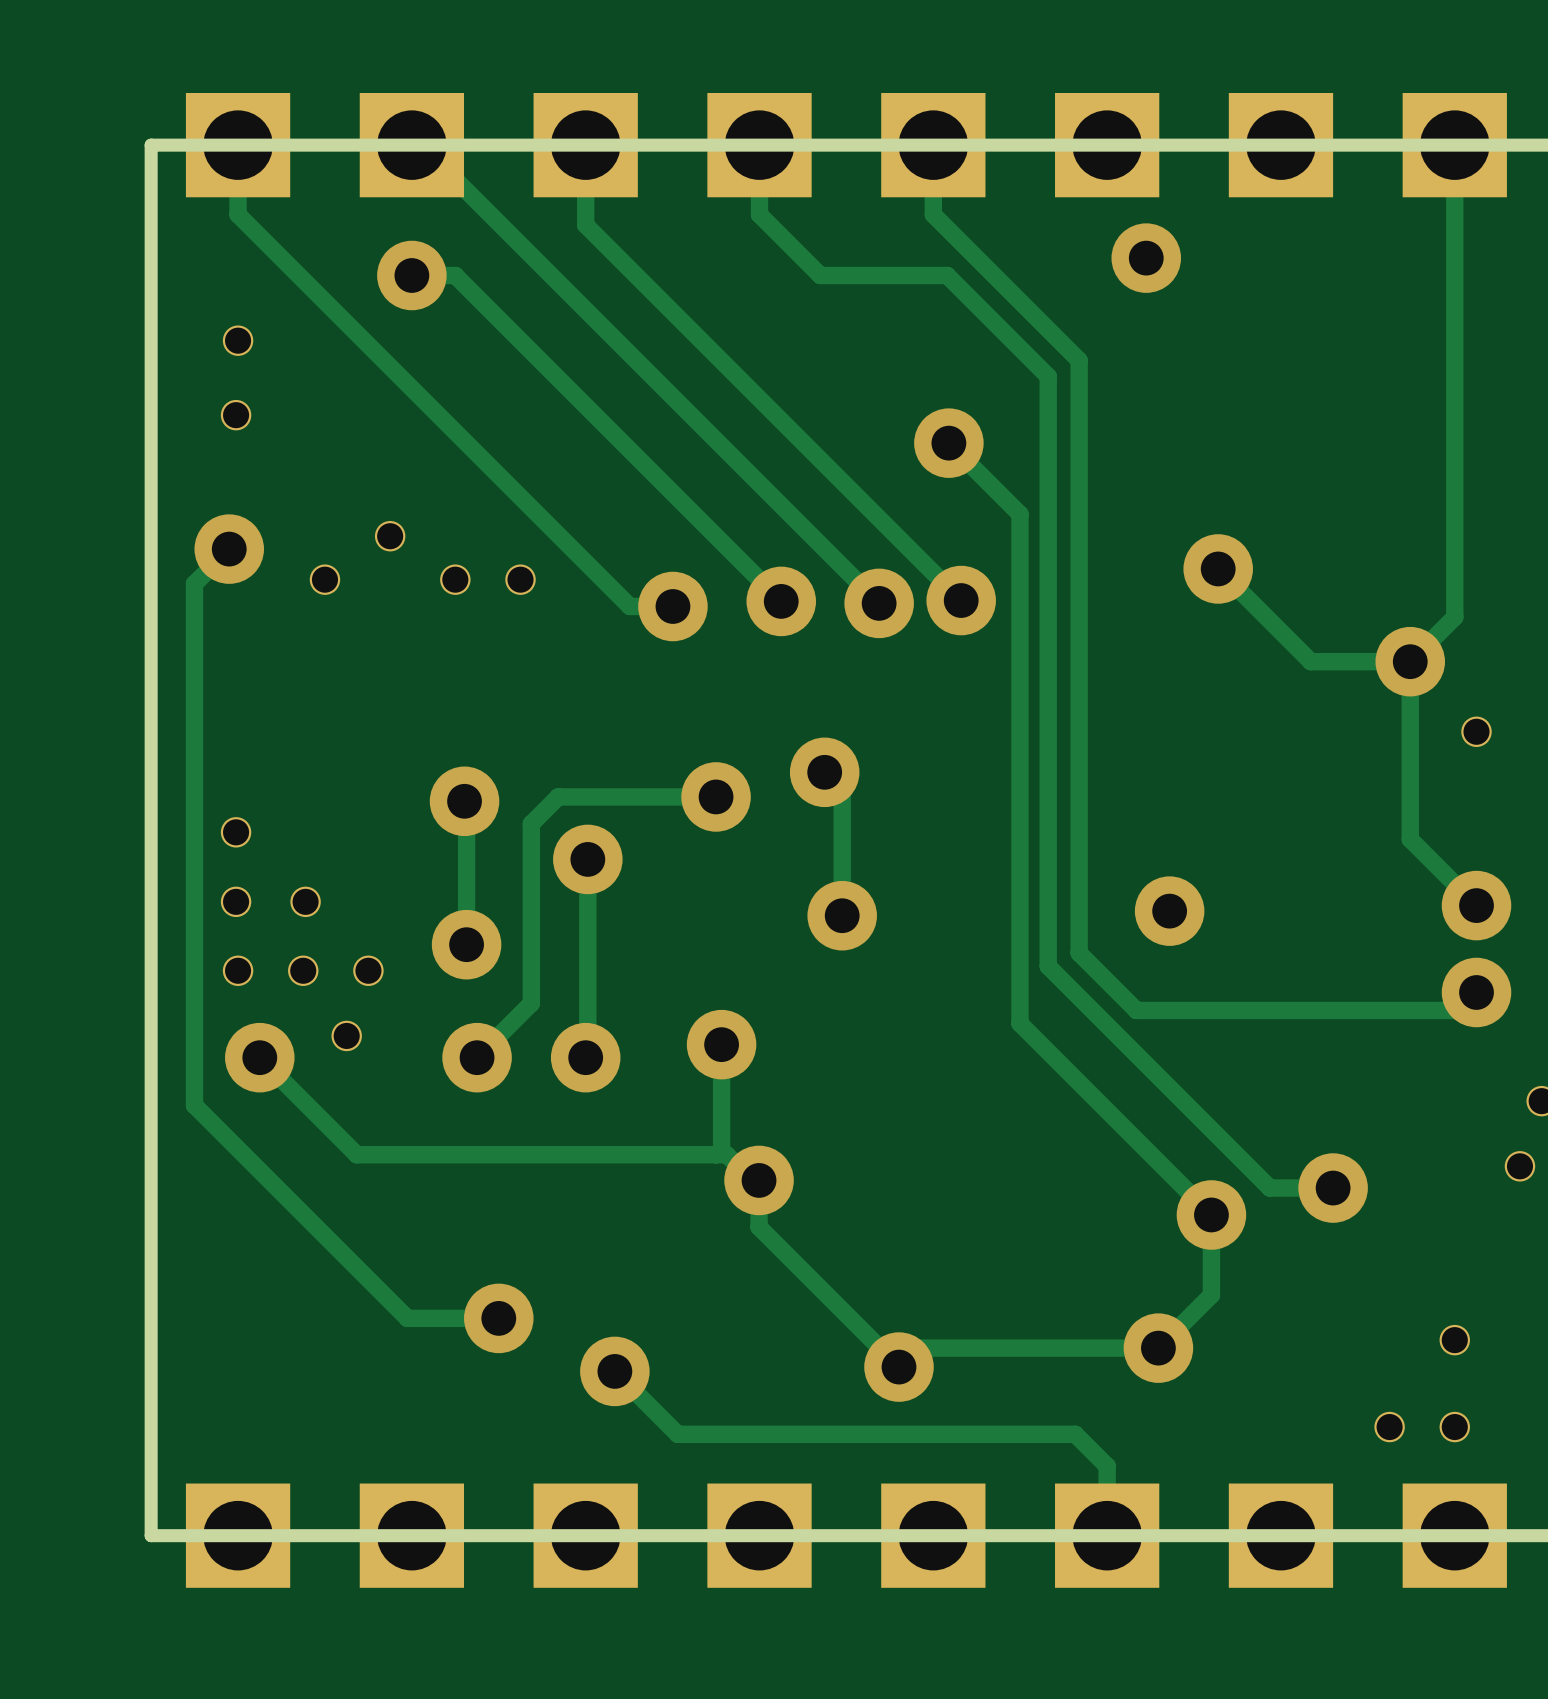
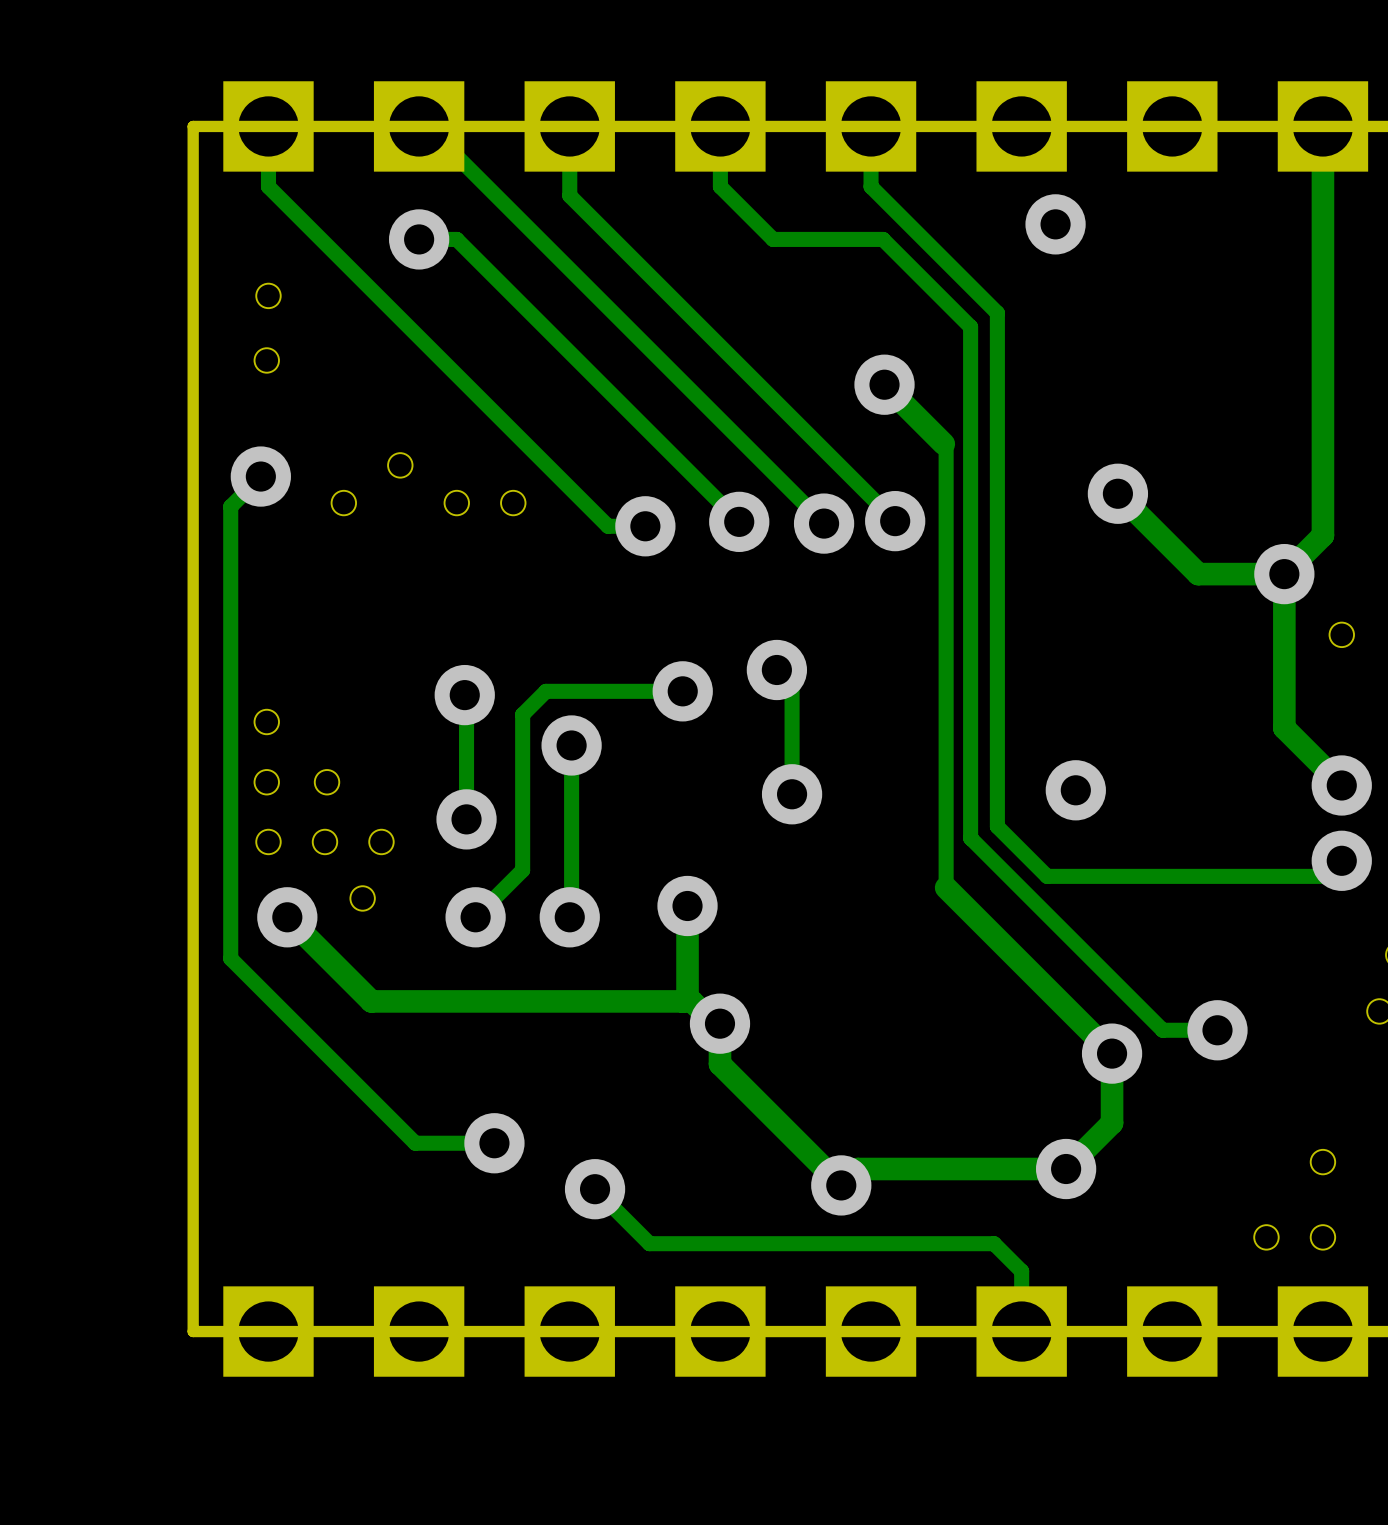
track width: thin (1454, 145) (1454, 617) (1410, 661) -> thick (1322, 126) (1322, 535) (1284, 574)
track width: thin (948, 443) (1017, 511) -> thick (884, 384) (943, 444)
track width: thin (1218, 568) (1310, 661) (1410, 661) -> thick (1117, 493) (1198, 574) (1284, 574)
track width: thin (1410, 661) (1410, 839) (1476, 905) -> thick (1284, 574) (1284, 728) (1341, 785)
track width: thin (1019, 1023) (1211, 1214) (1211, 1295) (1158, 1348) (917, 1348) (899, 1367) (759, 1227) (759, 1180) (752, 1180) (726, 1154) (356, 1154) (259, 1057) -> thick (946, 887) (1112, 1053) (1112, 1123) (1066, 1169) (857, 1169) (841, 1185) (719, 1064) (719, 1023) (714, 1023) (691, 1001) (371, 1001) (287, 917)
track width: thin (721, 1044) (721, 1149) (716, 1154) -> thick (687, 905) (687, 996) (682, 1001)

